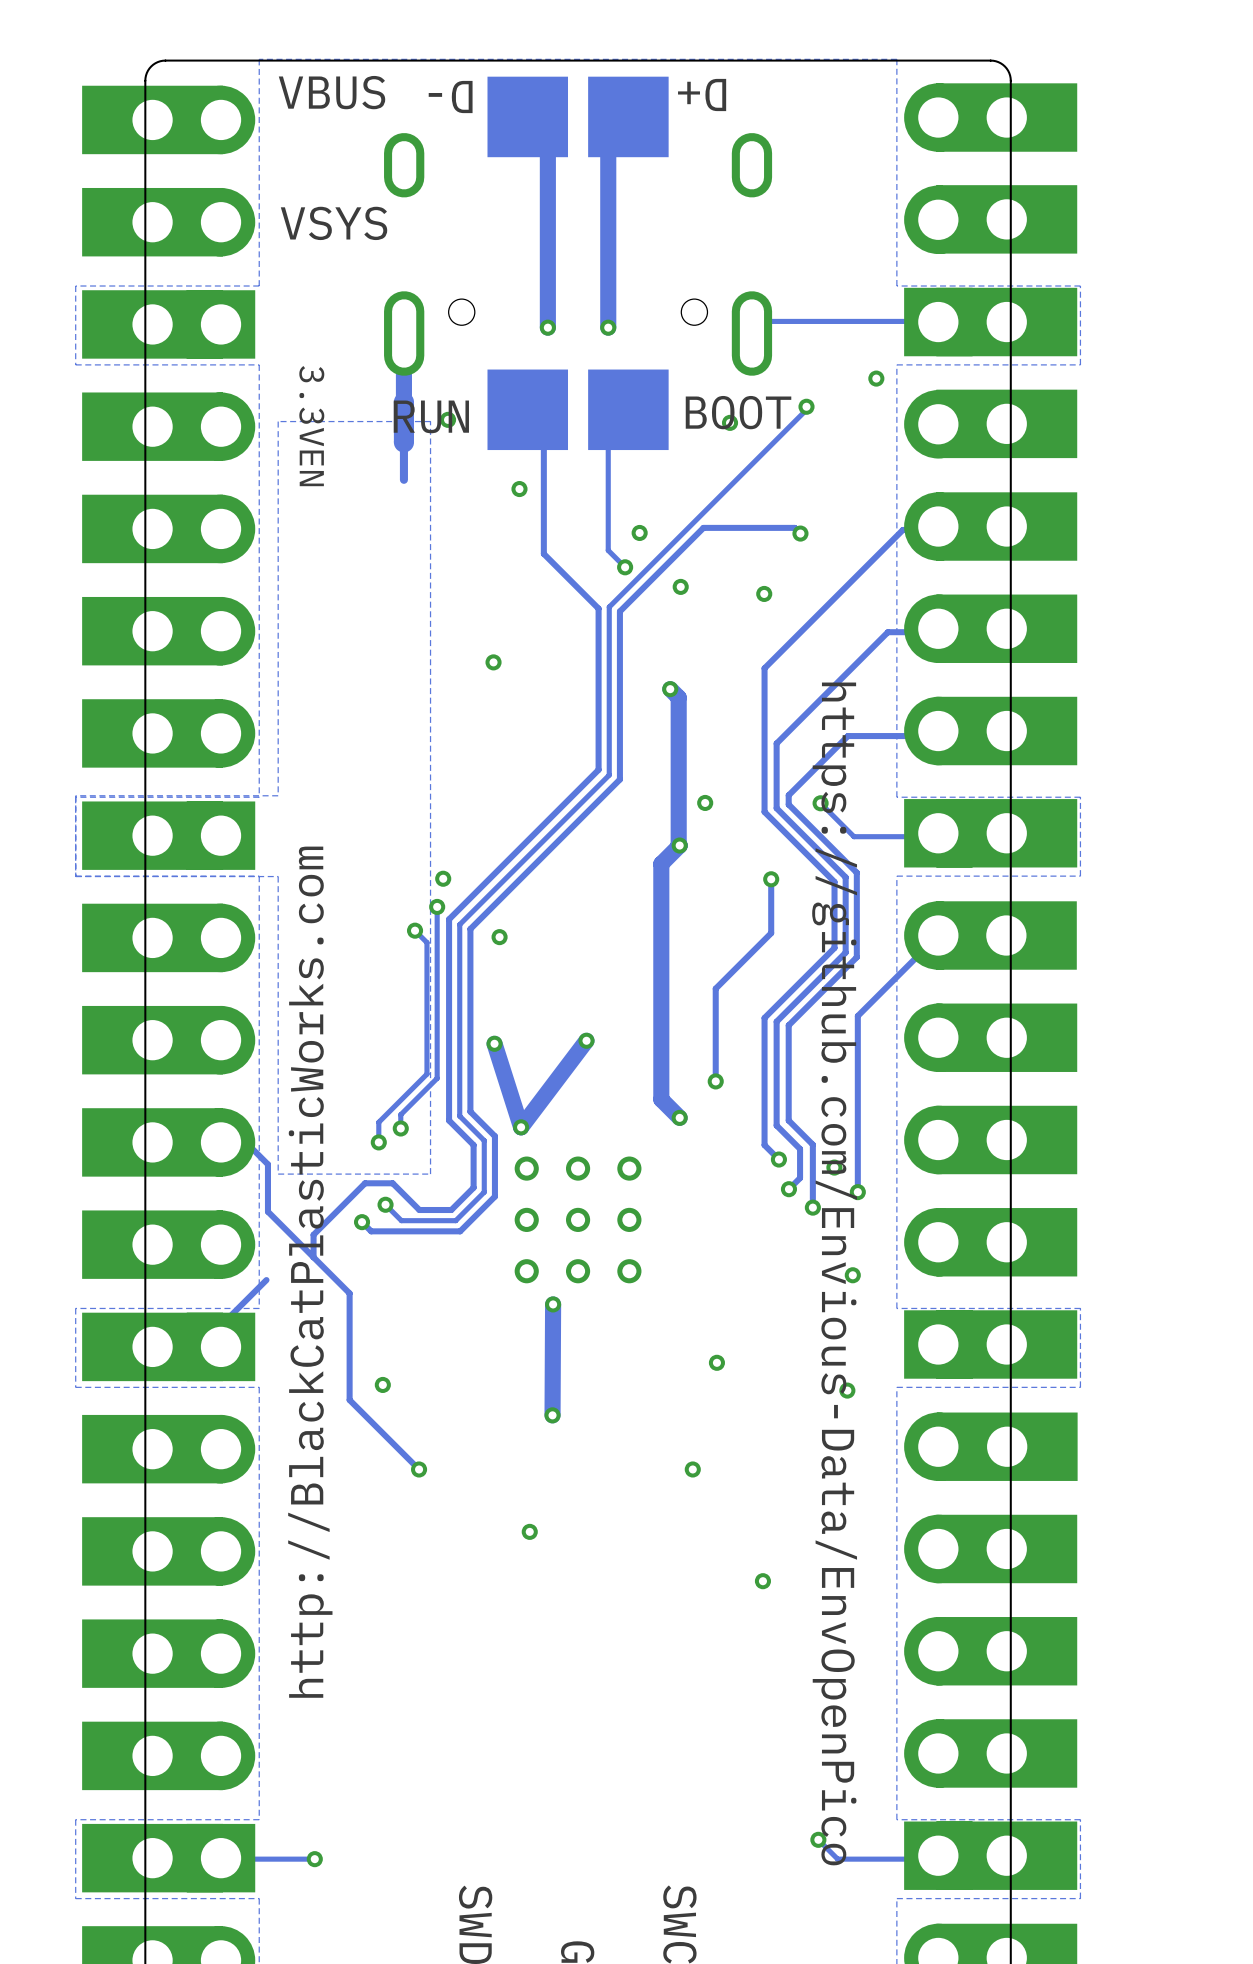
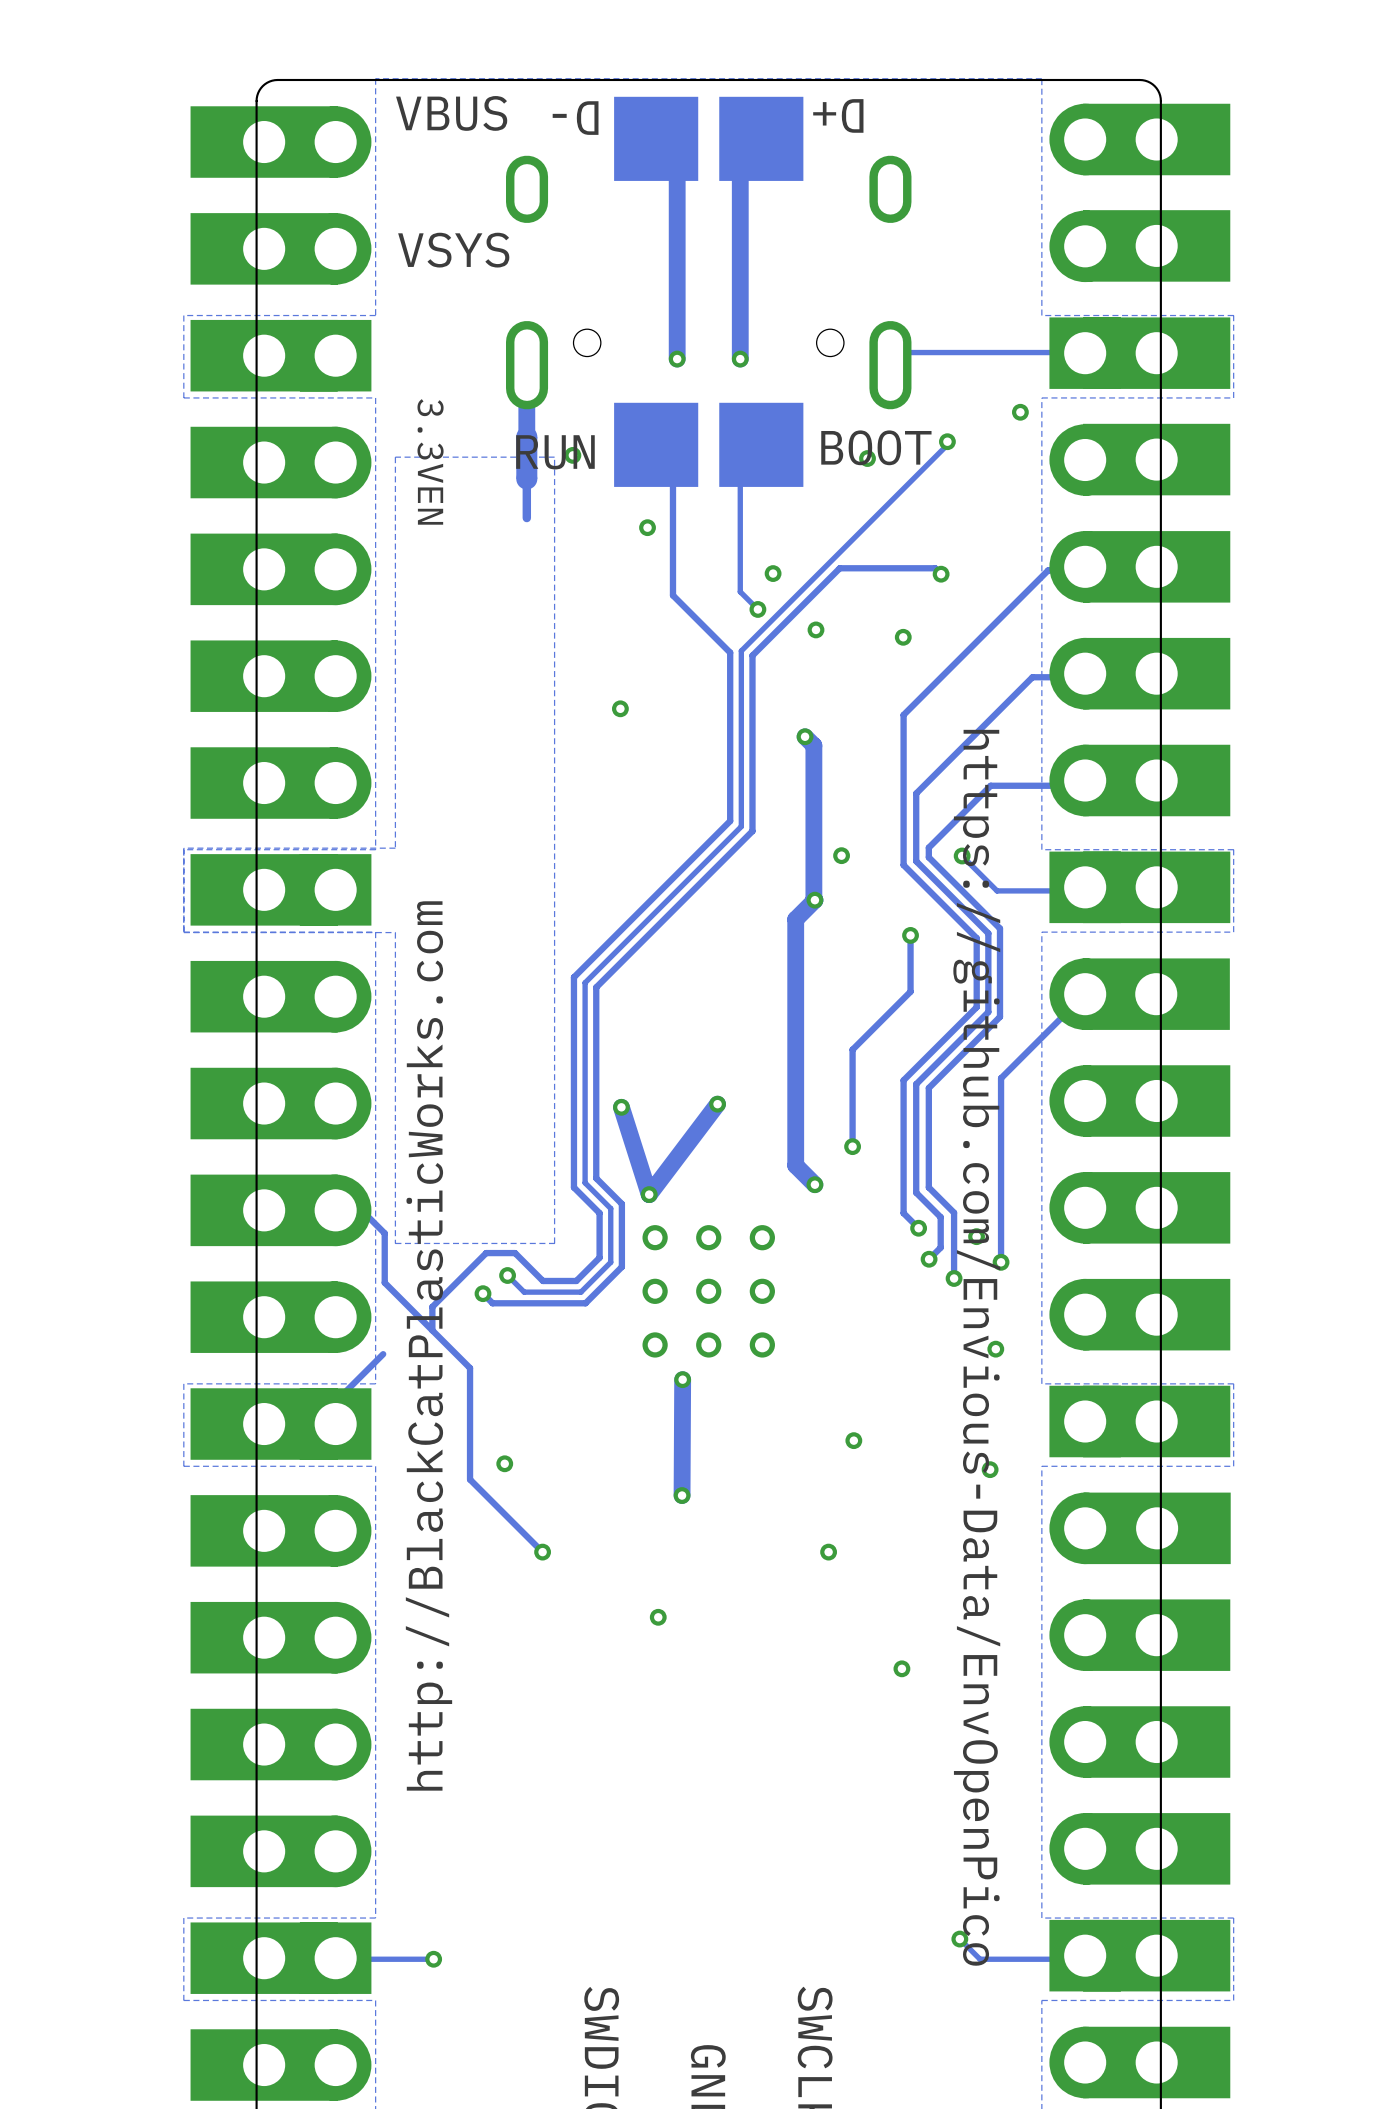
via: (443, 878) -> none
track: (437, 906) (437, 1078) (400, 1114) (400, 1128) -> none
via: (437, 906) -> none
track: (415, 930) (426, 942) (426, 1074) (378, 1122) (378, 1142) -> none
via: (415, 930) -> none
via: (499, 937) -> none
via: (400, 1128) -> none
via: (378, 1142) -> none

